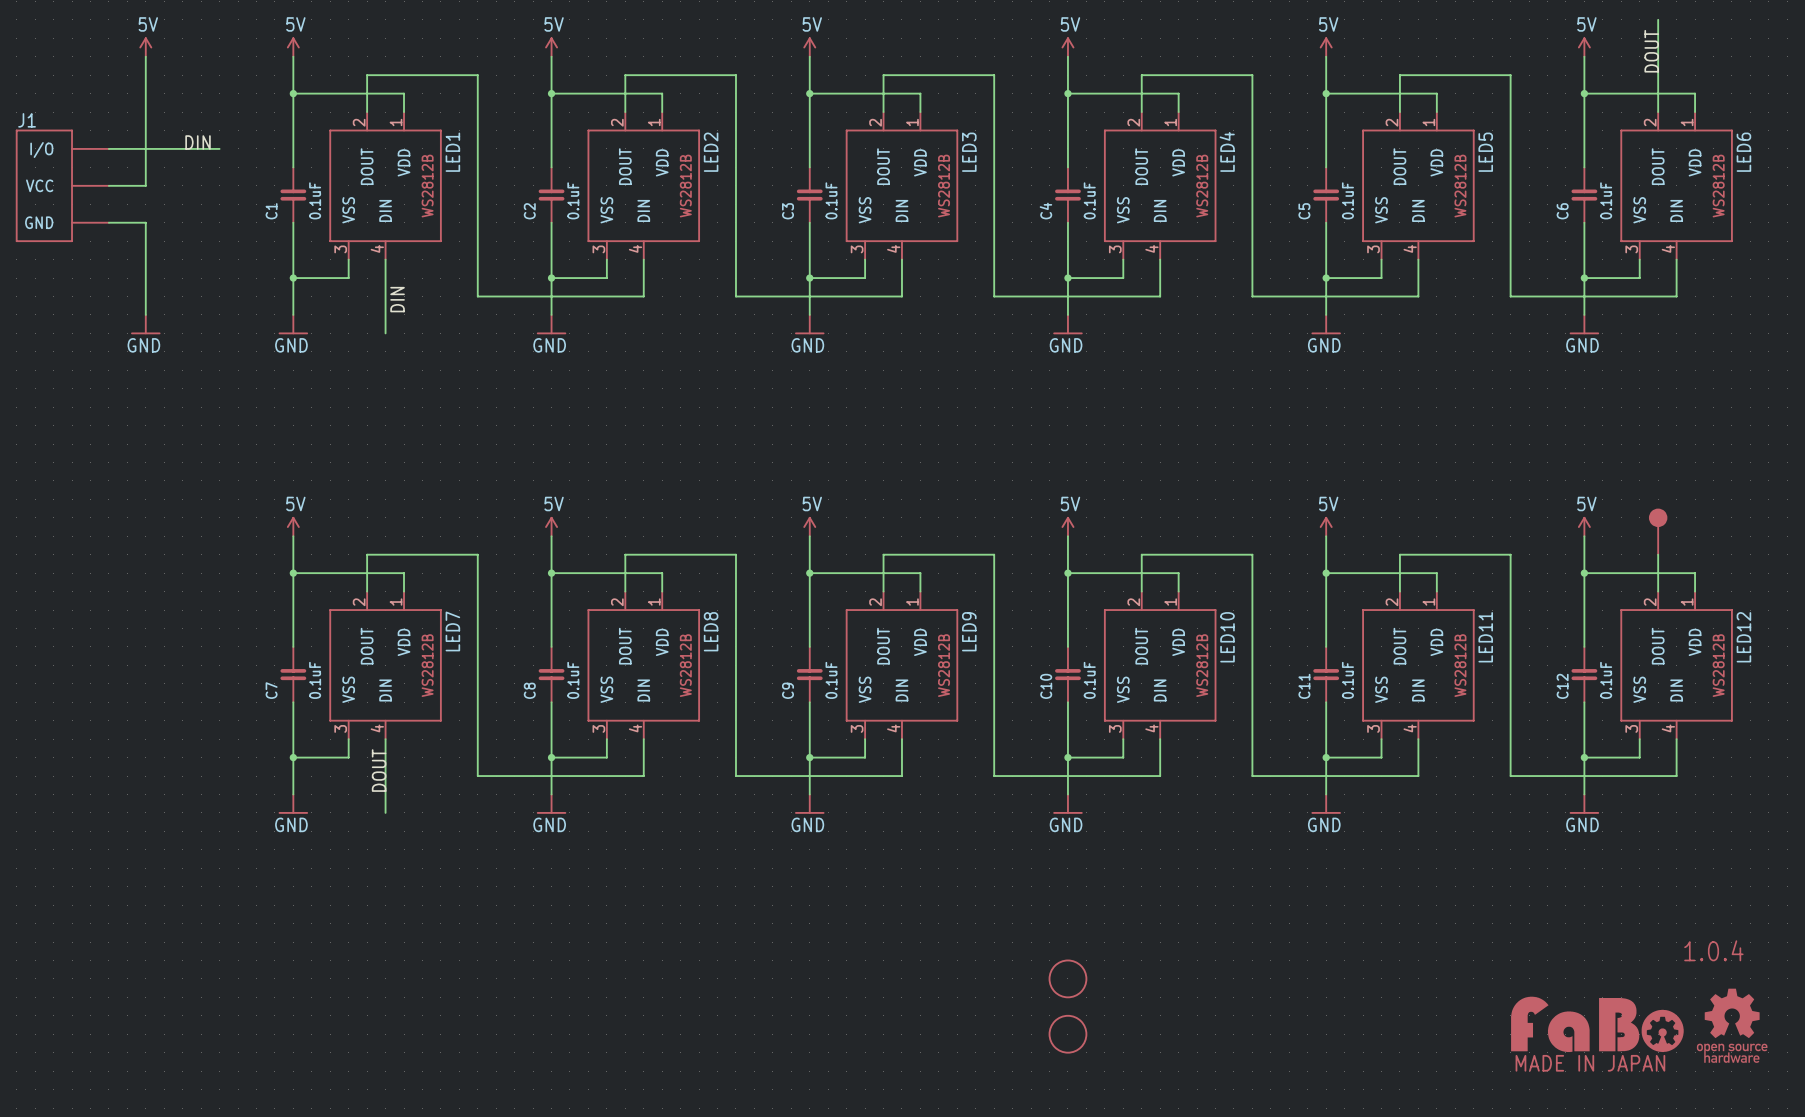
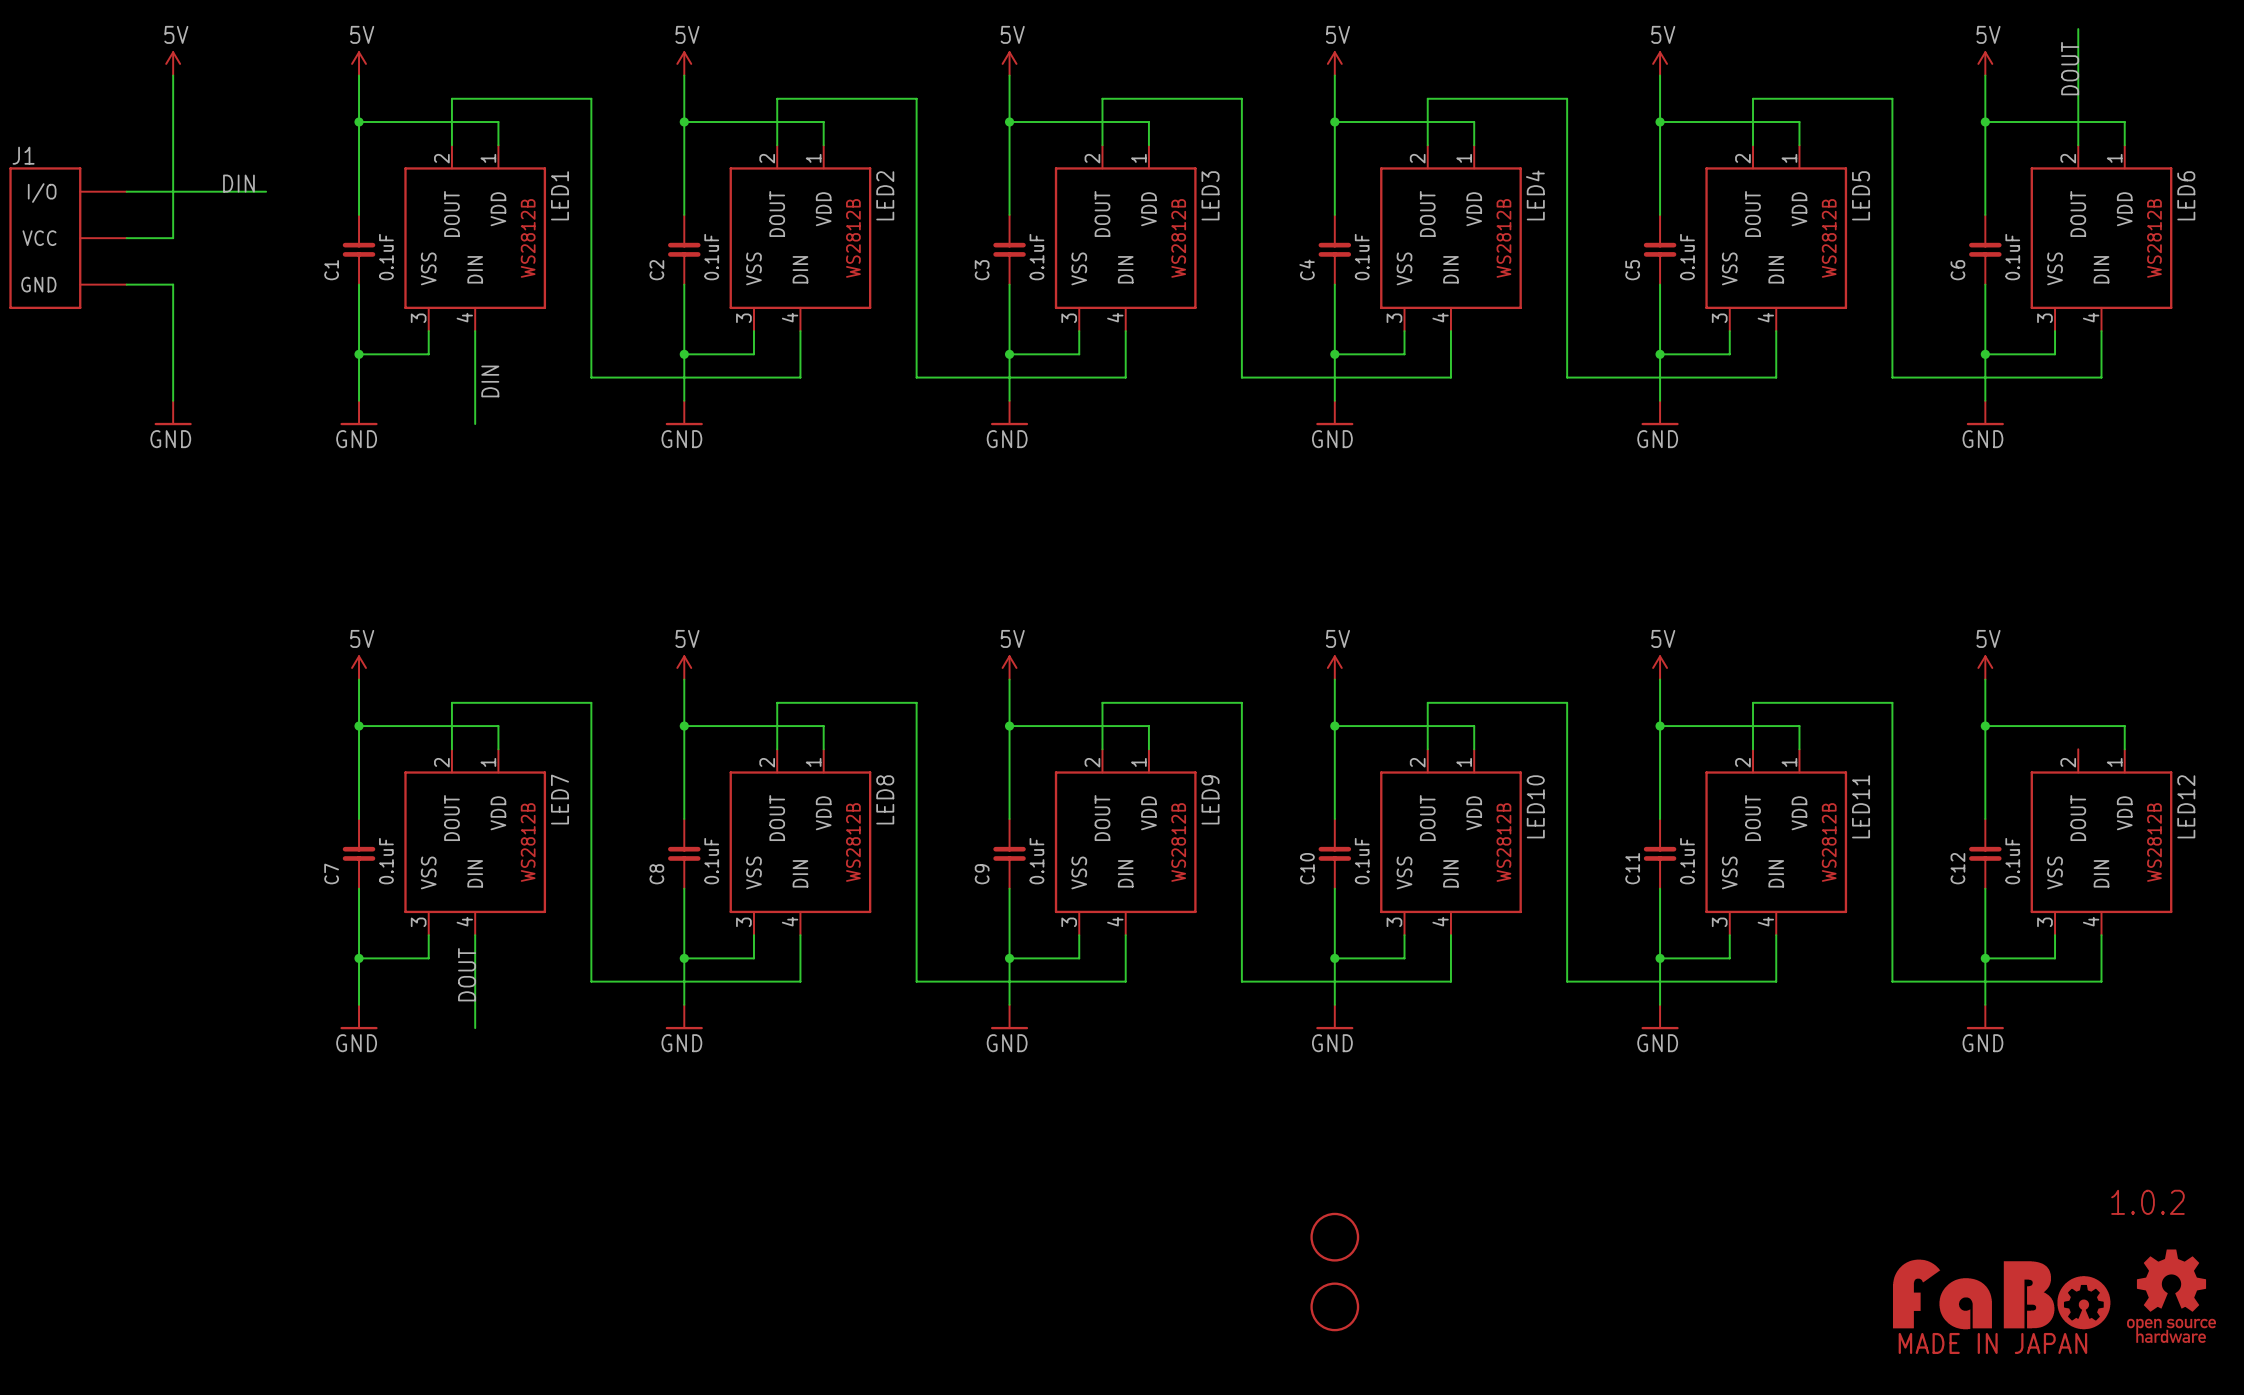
part: (1658, 531) -> none
wire: (1658, 554) (1658, 591) -> none
text: 1.0.4 (1713, 950) -> 1.0.2 (2147, 1202)

